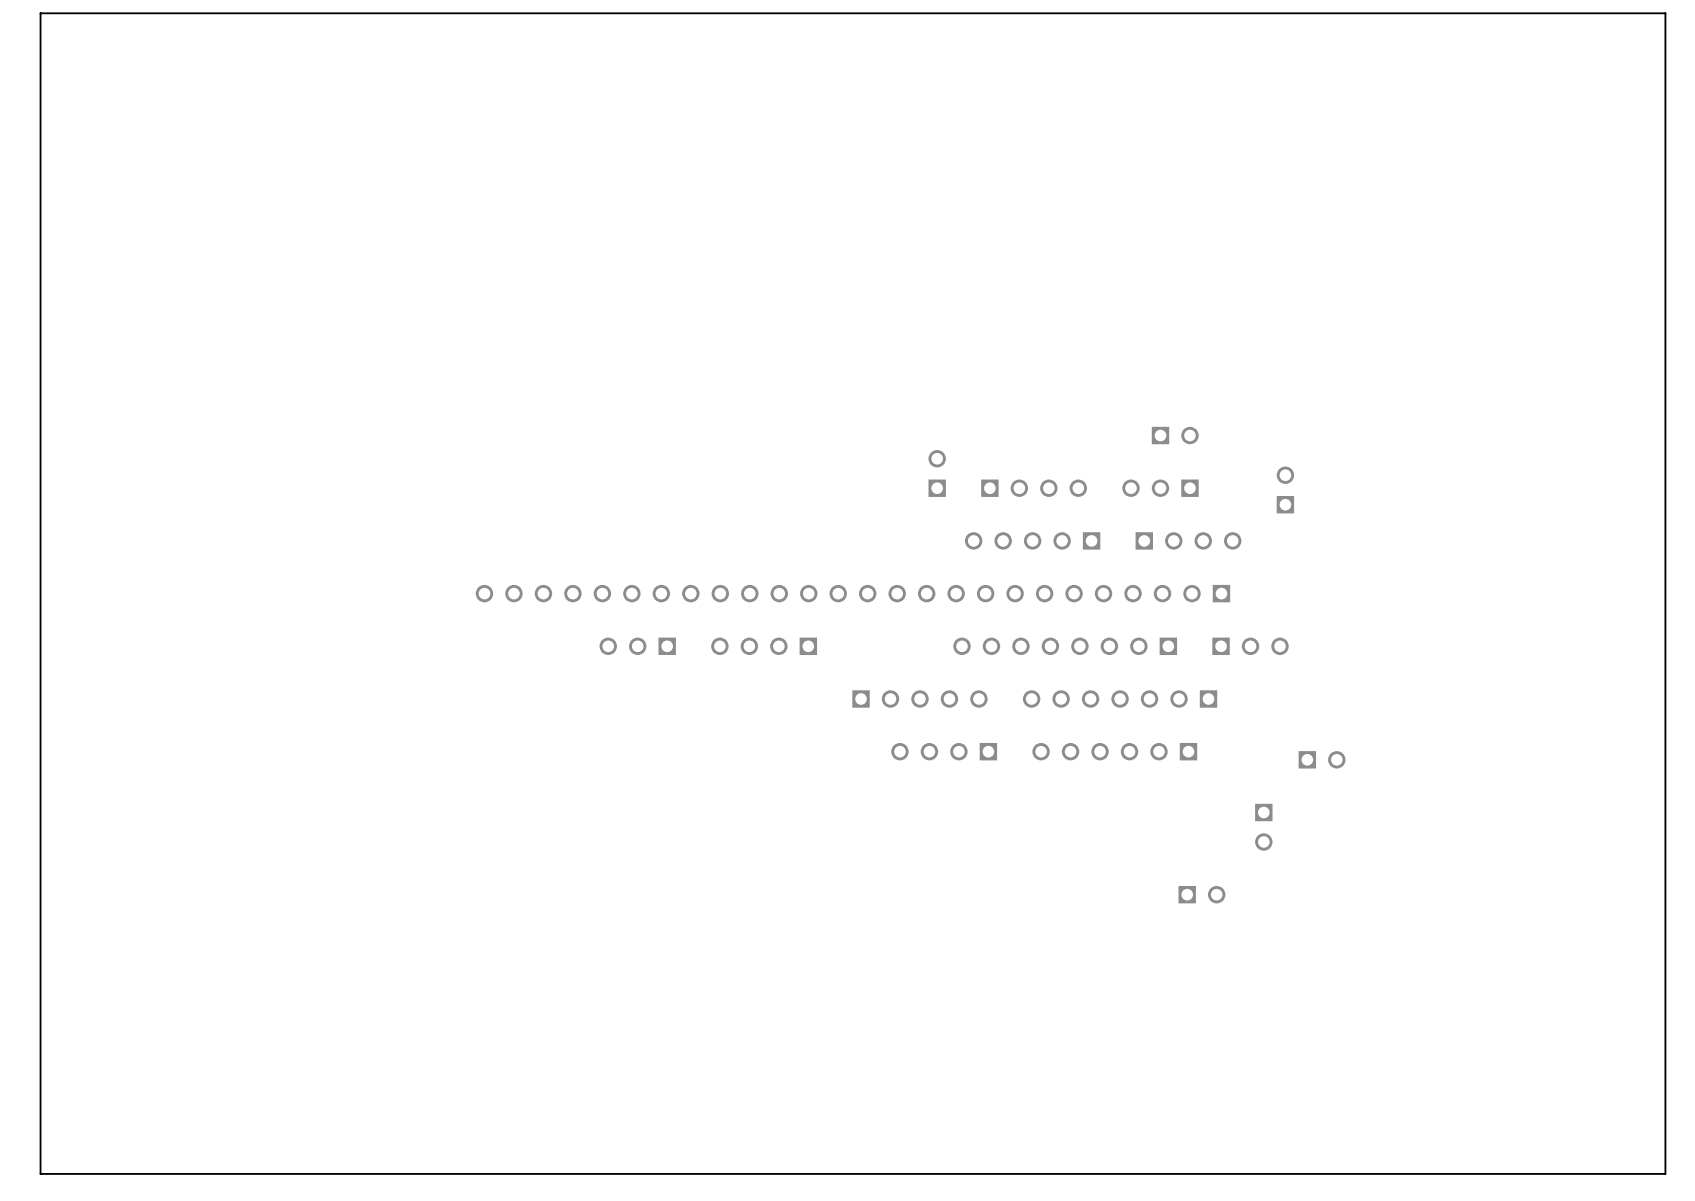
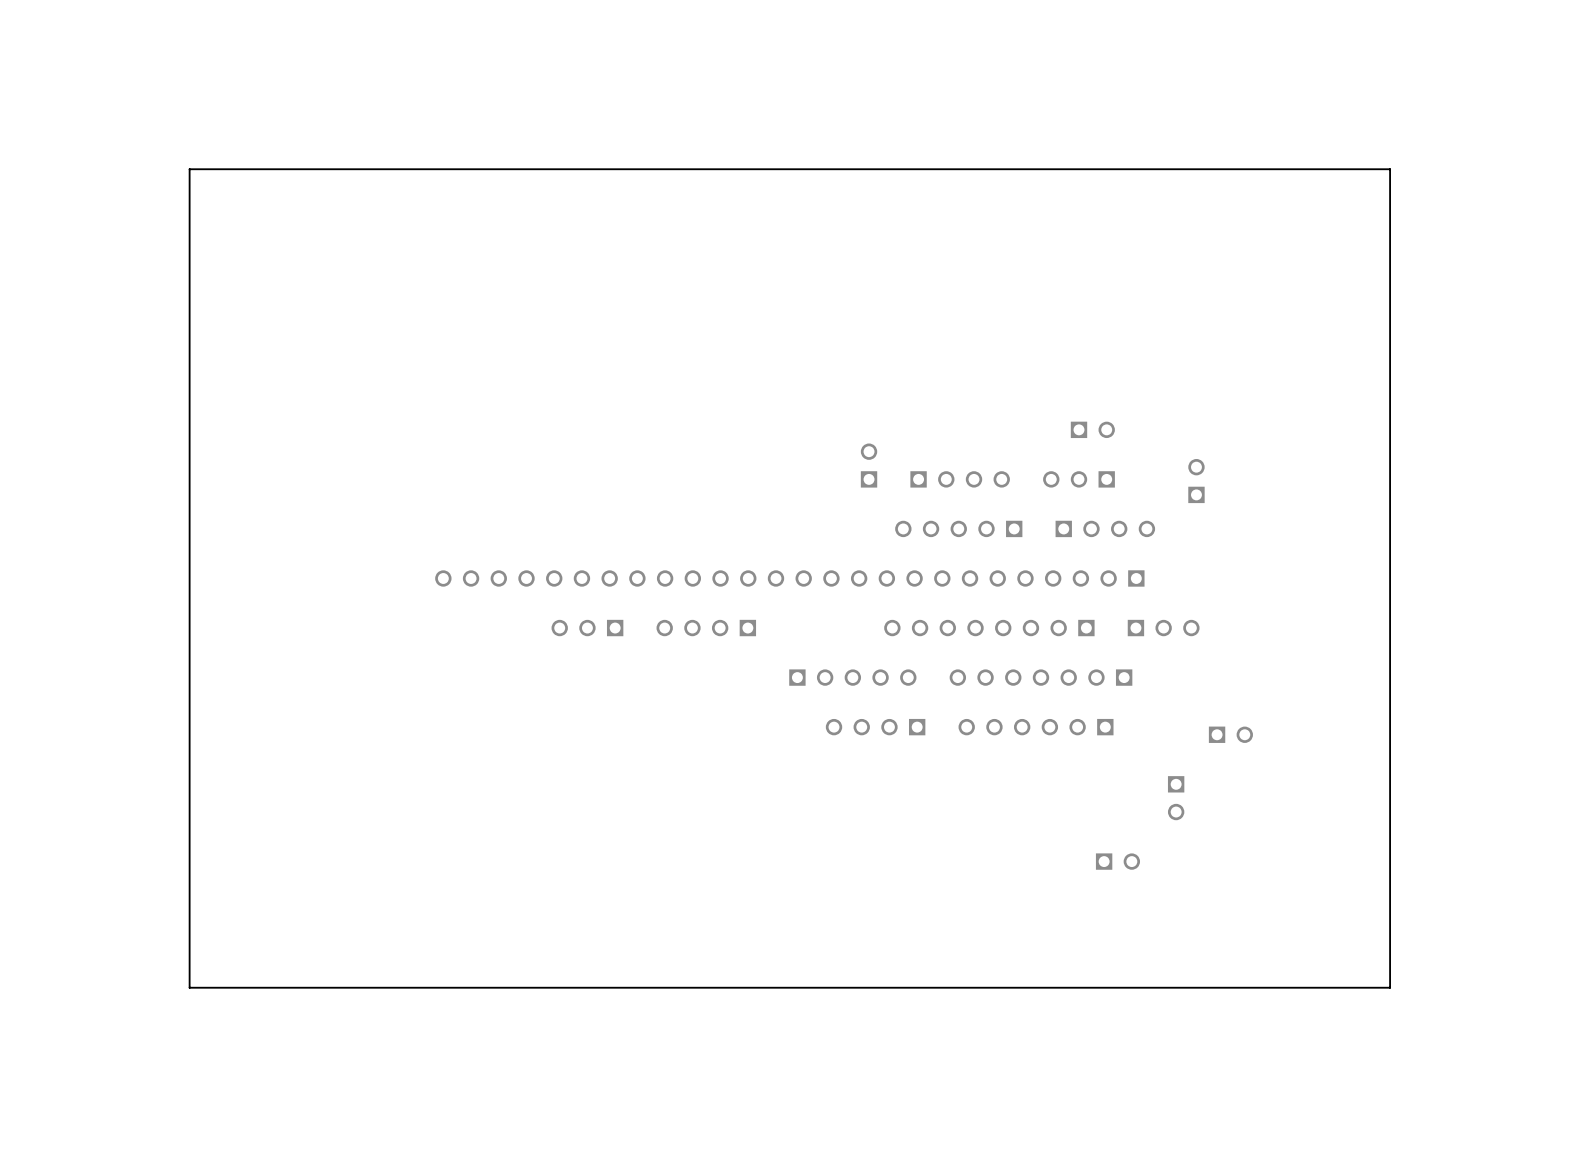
board edge: (1665, 13) (40, 13) (40, 1173) (1665, 1173) (1665, 13) -> (1390, 169) (1390, 987) (189, 987) (189, 169) (1390, 169)

